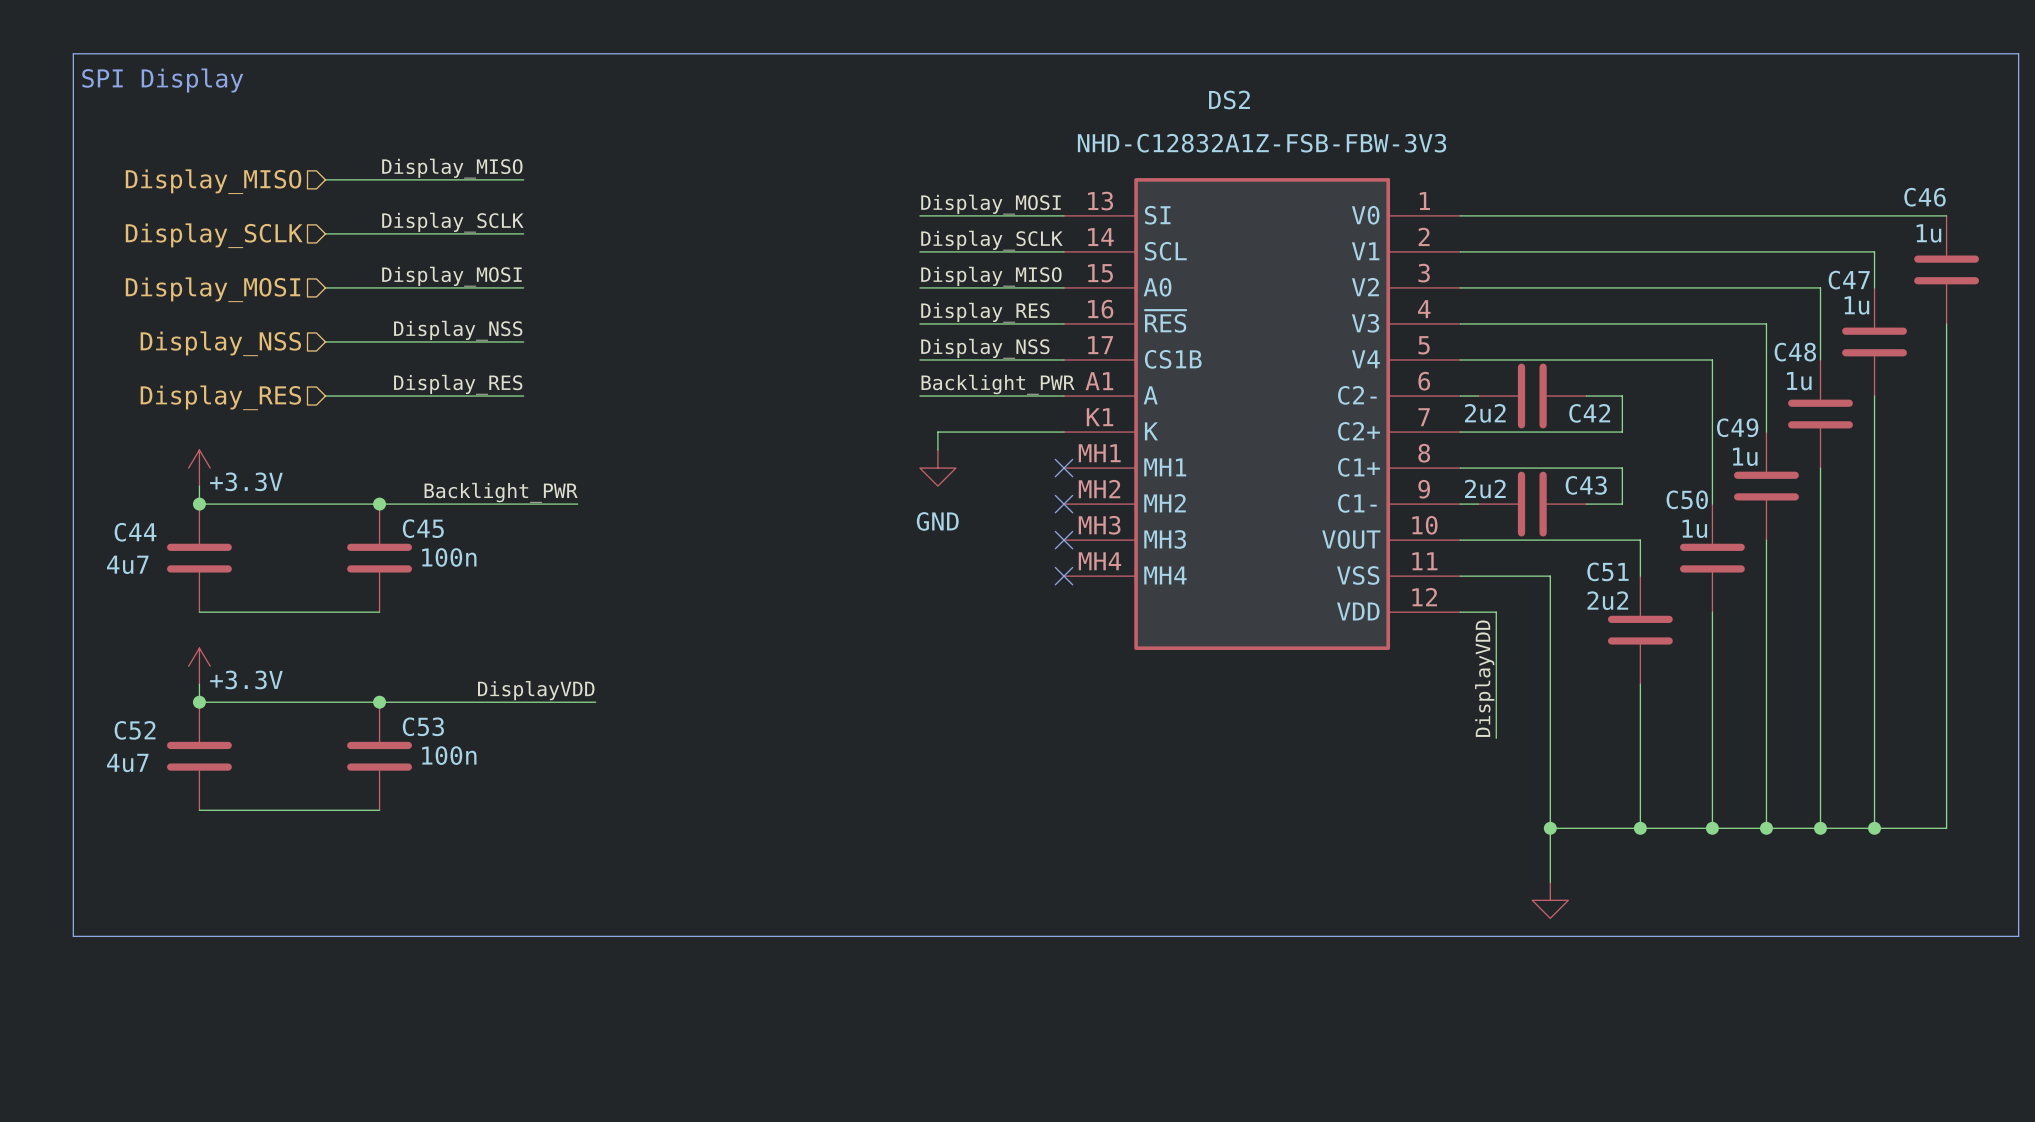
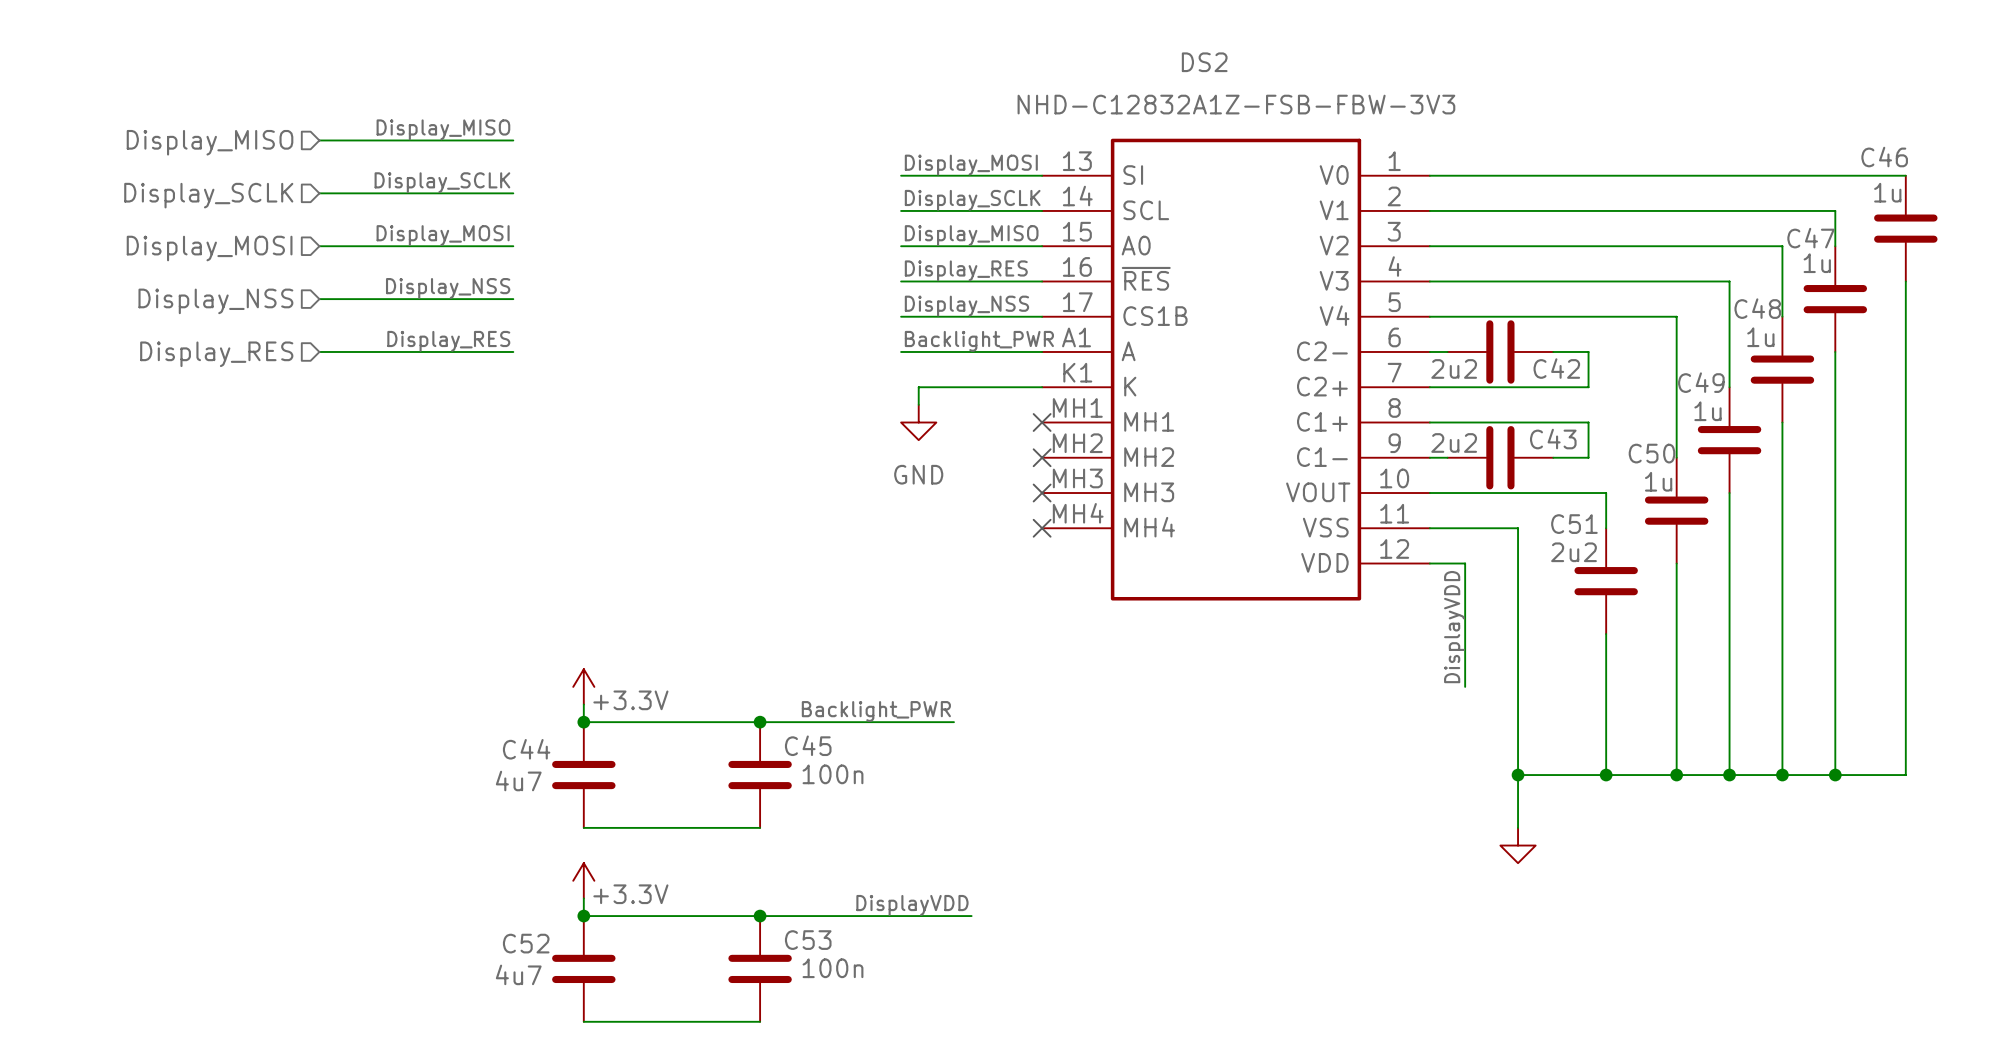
line: (73, 53) (2018, 53) (2018, 936) (73, 936) (73, 53) -> none
text: SPI Display (162, 80) -> none
power symbol: +3.3V (199, 468) -> none
wire: (199, 486) (199, 504) (577, 504) -> none
label: Backlight_PWR (501, 492) -> none
junction: (199, 504) -> none
junction: (379, 504) -> none
C44 position: (199, 558) -> (583, 775)
C45 position: (379, 558) -> (760, 775)
wire: (199, 612) (379, 612) -> none
power symbol: +3.3V (199, 666) -> none
wire: (199, 684) (199, 702) (595, 702) -> none
label: DisplayVDD (536, 690) -> none
junction: (199, 702) -> none
junction: (379, 702) -> none
power symbol: none -> +3.3V (583, 686)
C52 position: (199, 756) -> (583, 968)
C53 position: (379, 756) -> (760, 968)
wire: none -> (583, 704) (583, 722) (953, 722)
label: none -> Backlight_PWR (876, 711)
junction: none -> (583, 722)
junction: none -> (760, 722)
wire: (199, 810) (379, 810) -> none
wire: none -> (583, 827) (760, 827)
power symbol: none -> +3.3V (583, 880)
wire: none -> (583, 898) (583, 916) (971, 916)
label: none -> DisplayVDD (912, 905)
junction: none -> (583, 916)
junction: none -> (760, 916)
wire: none -> (583, 1021) (760, 1021)

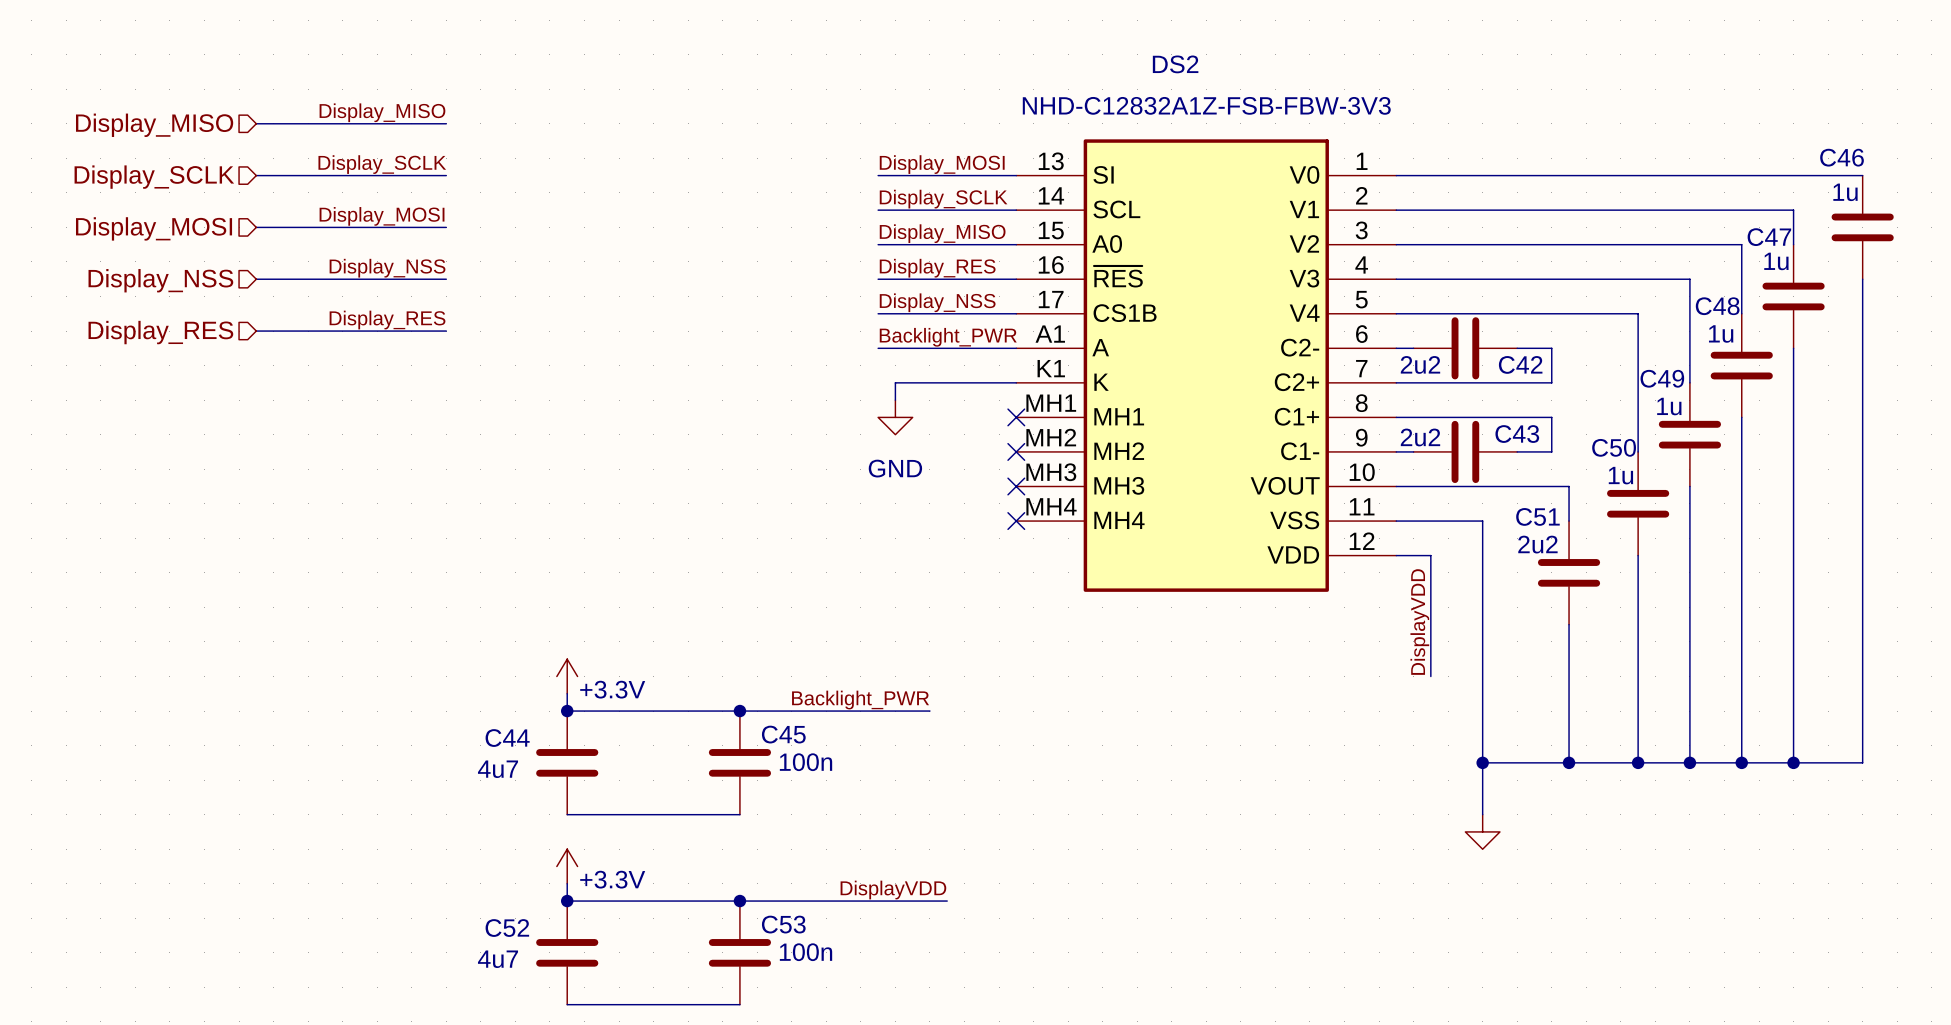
label position: Display_MISO (443, 129) -> Display_MISO (382, 112)
wire: (319, 140) (513, 140) -> (256, 123) (446, 123)
hierarchical label position: Display_MISO (210, 142) -> Display_MISO (154, 125)
label position: Display_SCLK (442, 182) -> Display_SCLK (382, 164)
wire: (319, 193) (513, 193) -> (256, 175) (446, 175)
hierarchical label position: Display_SCLK (208, 195) -> Display_SCLK (154, 177)
label position: Display_MOSI (443, 235) -> Display_MOSI (382, 216)
wire: (319, 246) (513, 246) -> (256, 227) (446, 227)
hierarchical label position: Display_MOSI (209, 248) -> Display_MOSI (154, 228)
label position: Display_NSS (448, 288) -> Display_NSS (387, 268)
wire: (319, 299) (513, 299) -> (256, 279) (446, 279)
hierarchical label position: Display_NSS (215, 301) -> Display_NSS (160, 280)
label position: Display_RES (448, 341) -> Display_RES (387, 320)
wire: (319, 351) (513, 351) -> (256, 331) (446, 331)
hierarchical label position: Display_RES (216, 354) -> Display_RES (160, 332)

